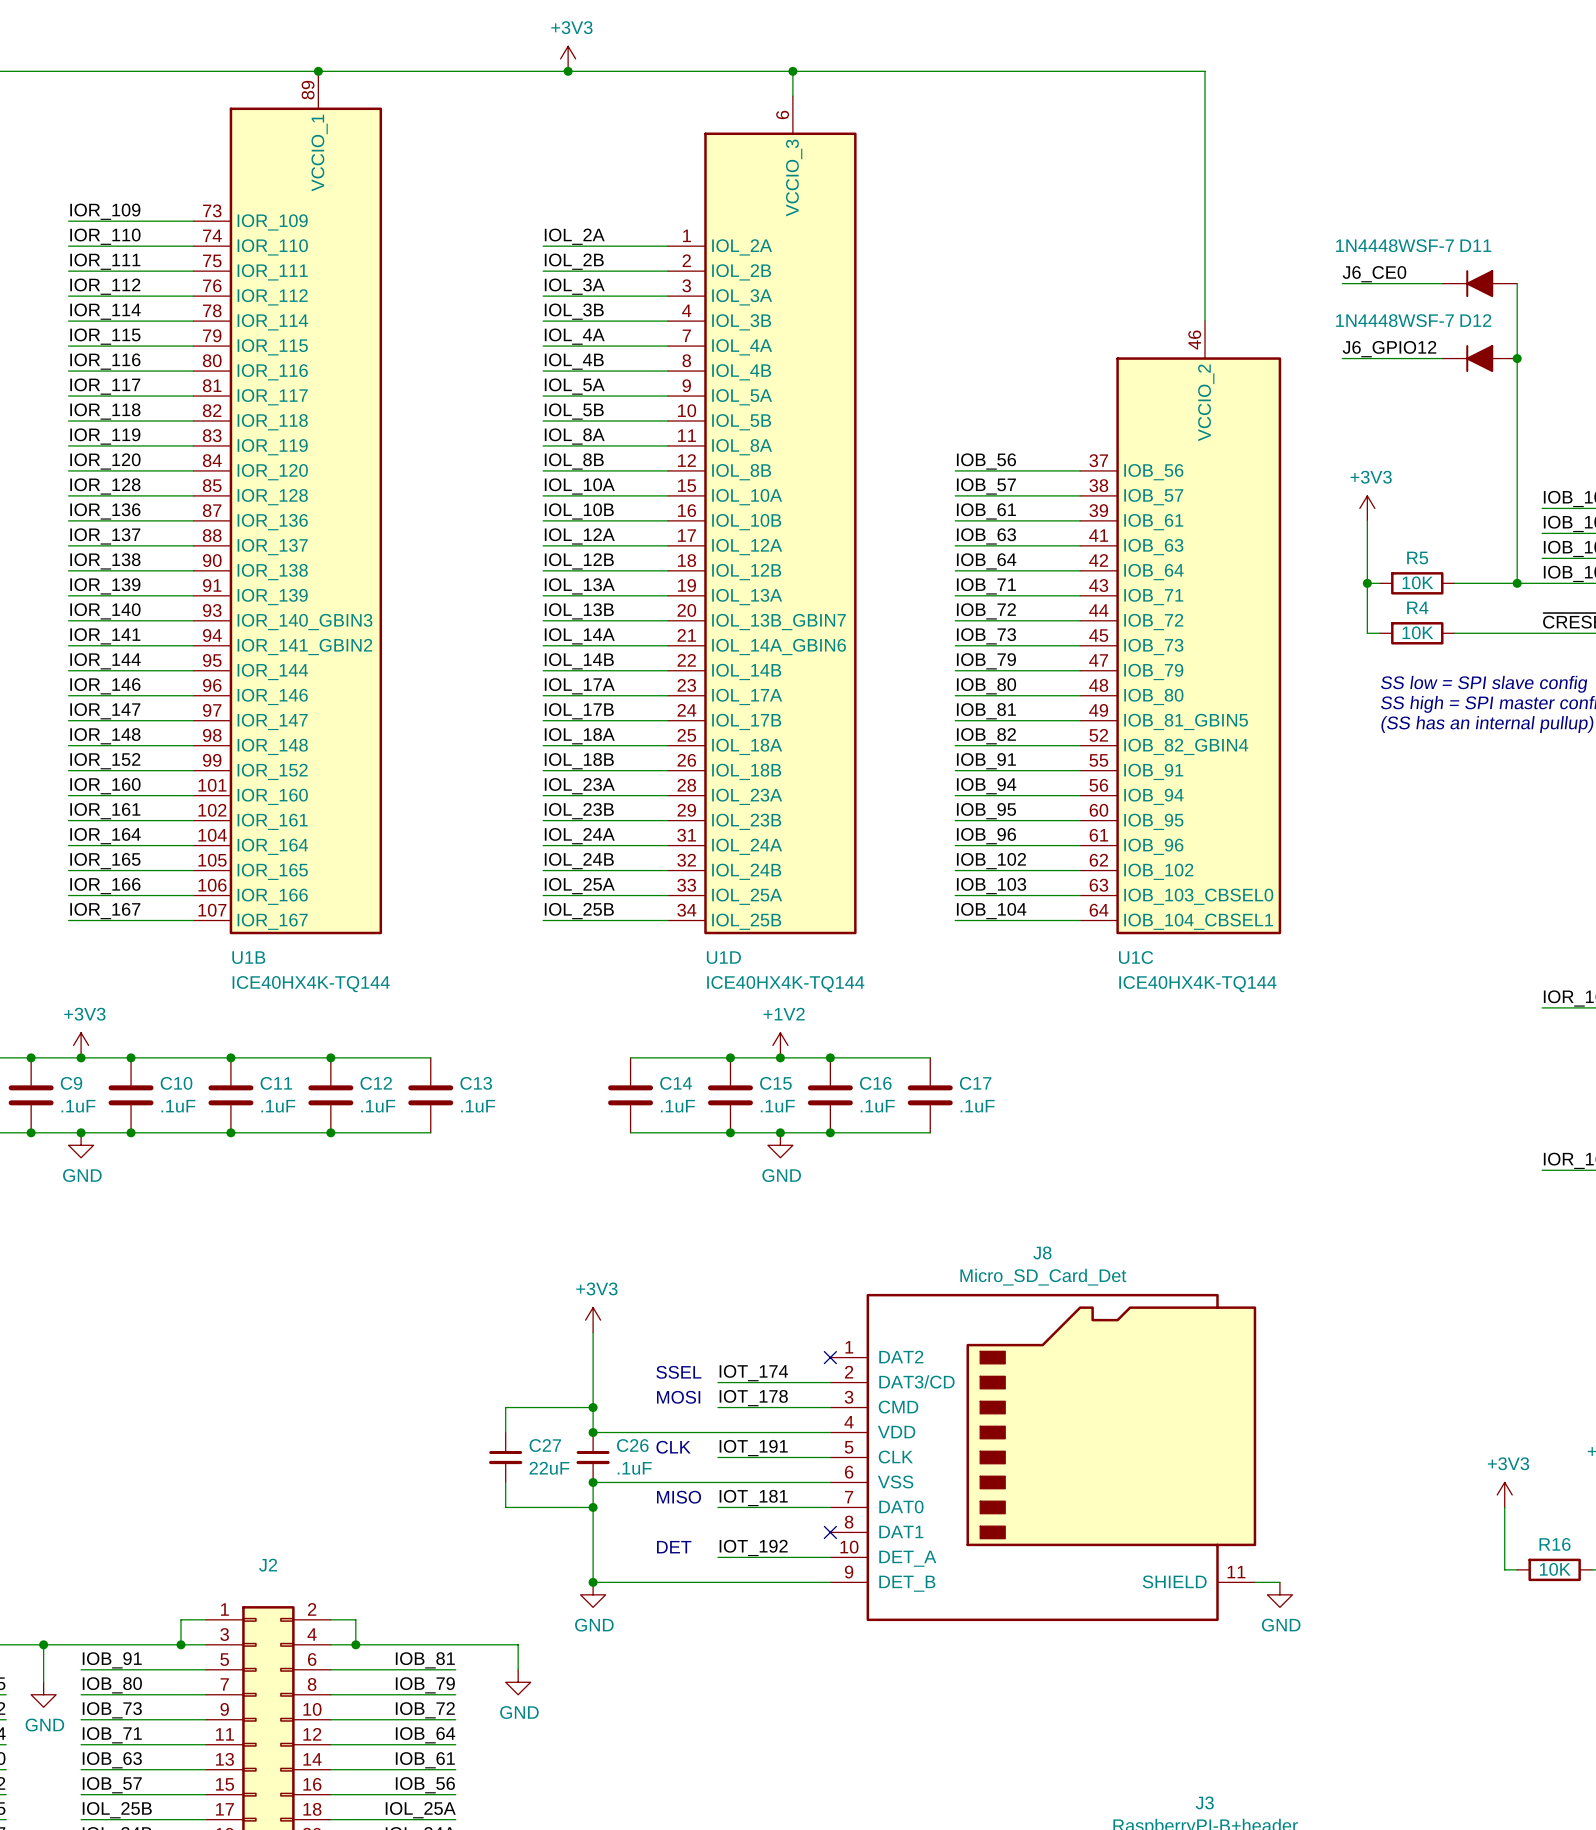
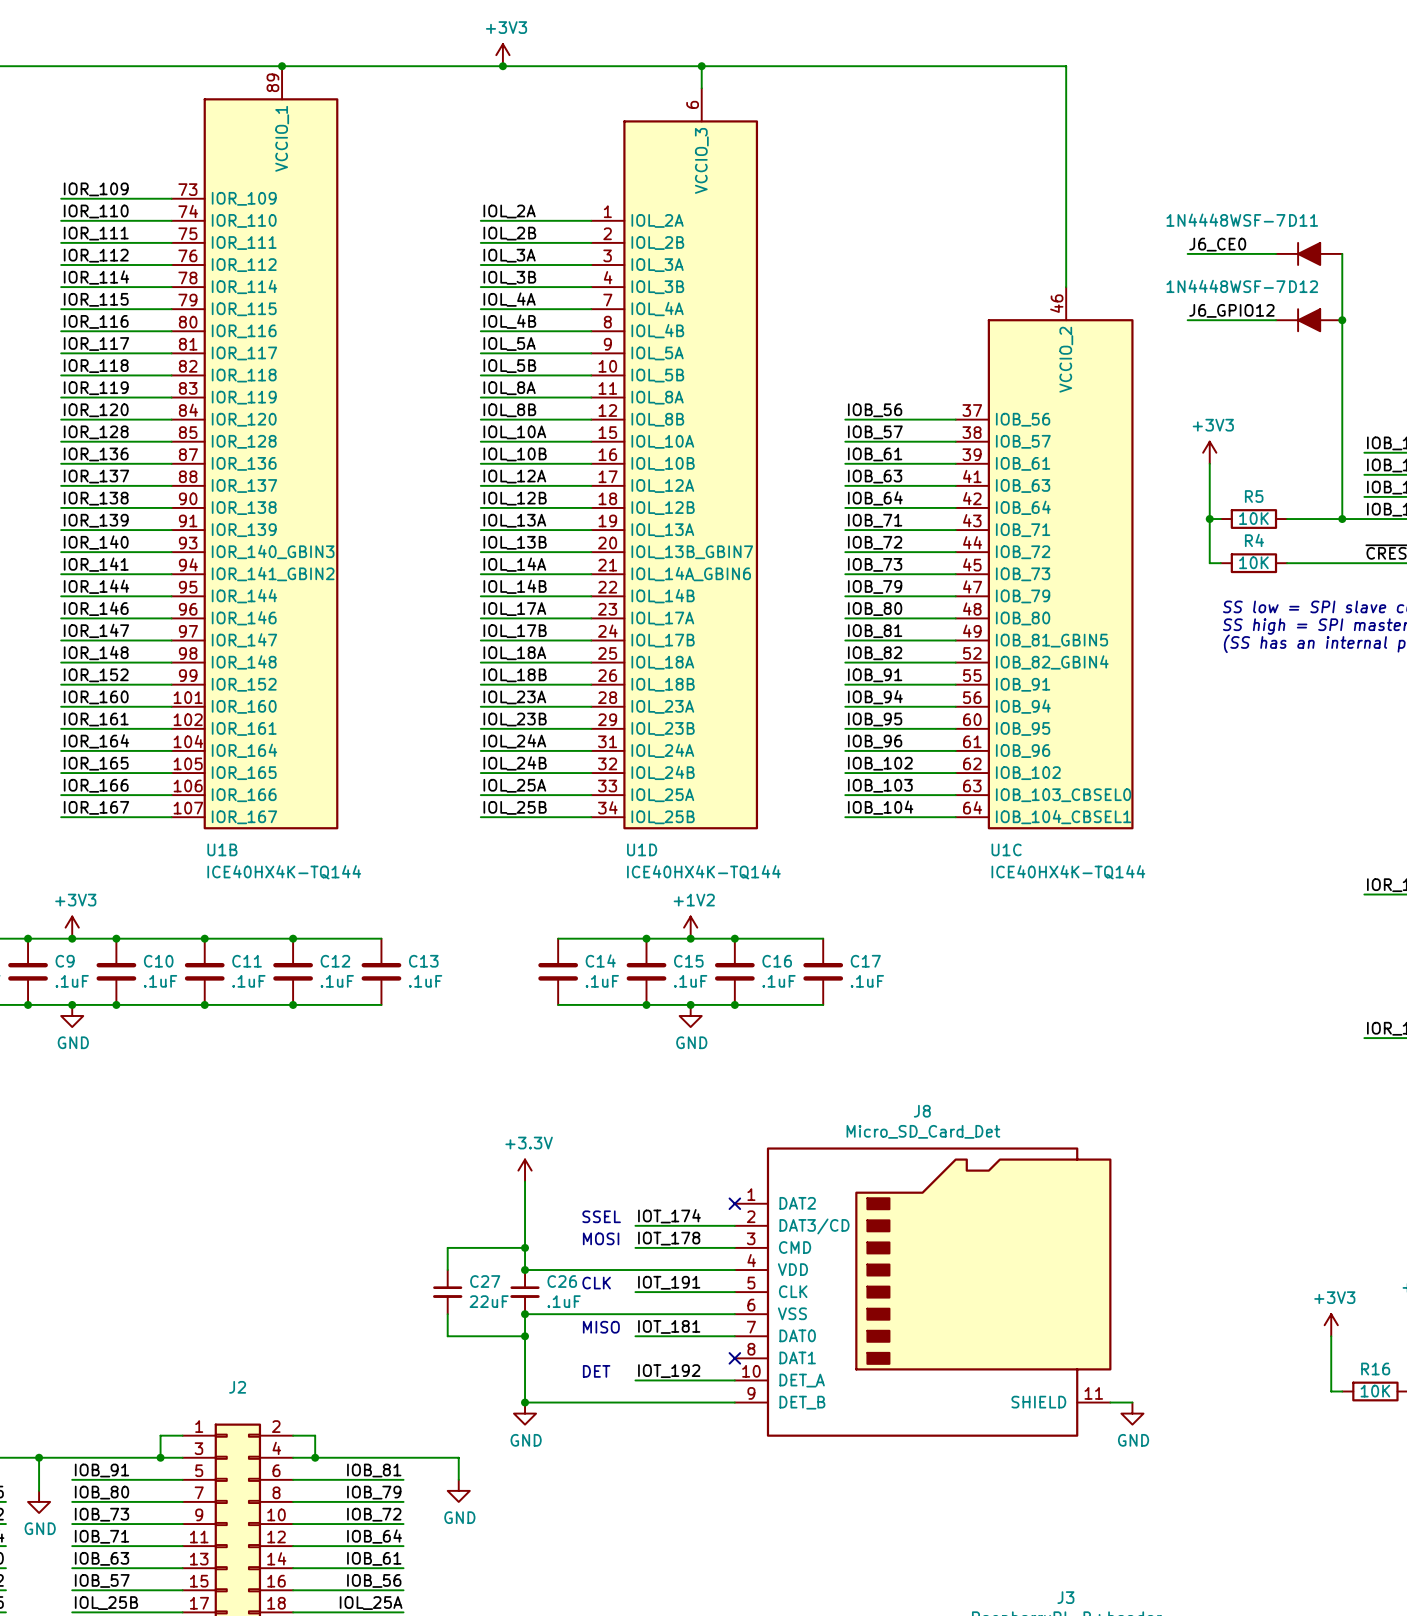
power symbol: +3V3 (593, 1320) -> +3.3V (525, 1170)

